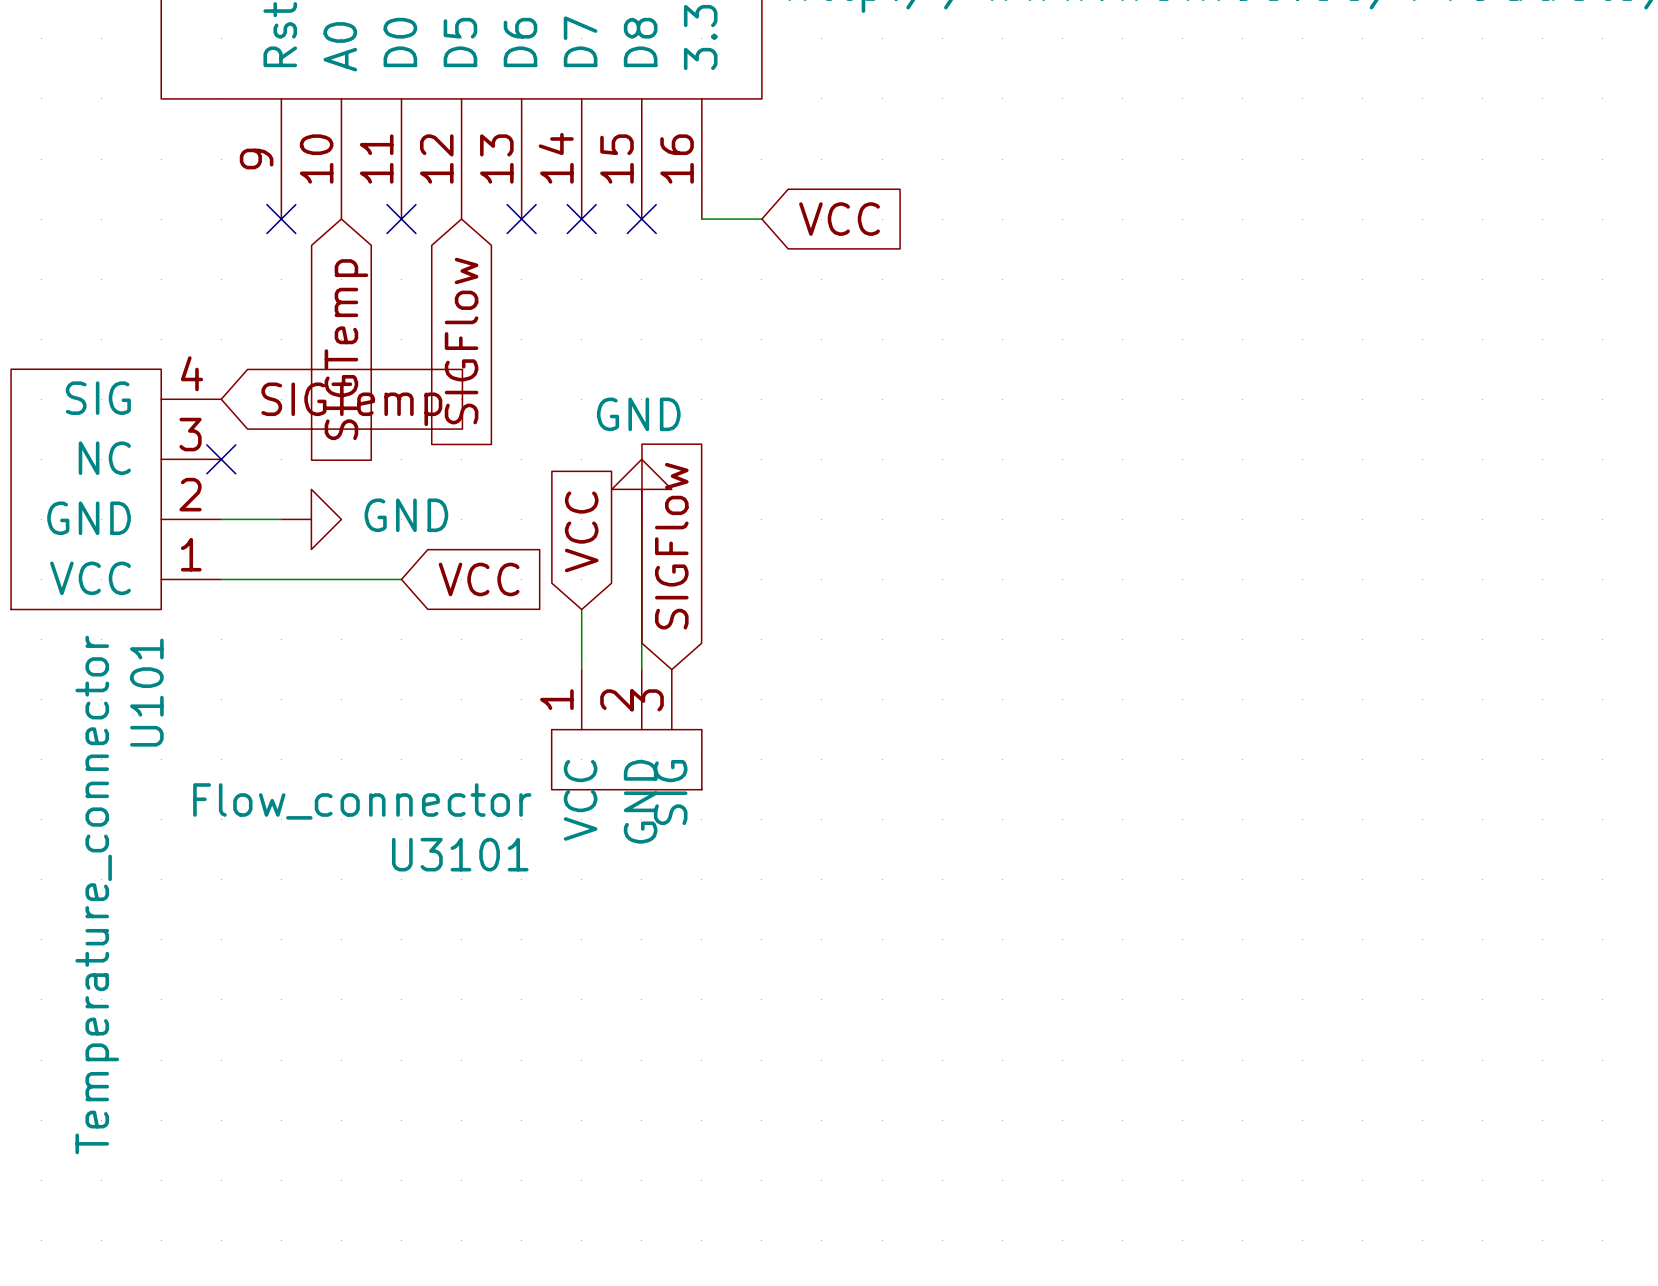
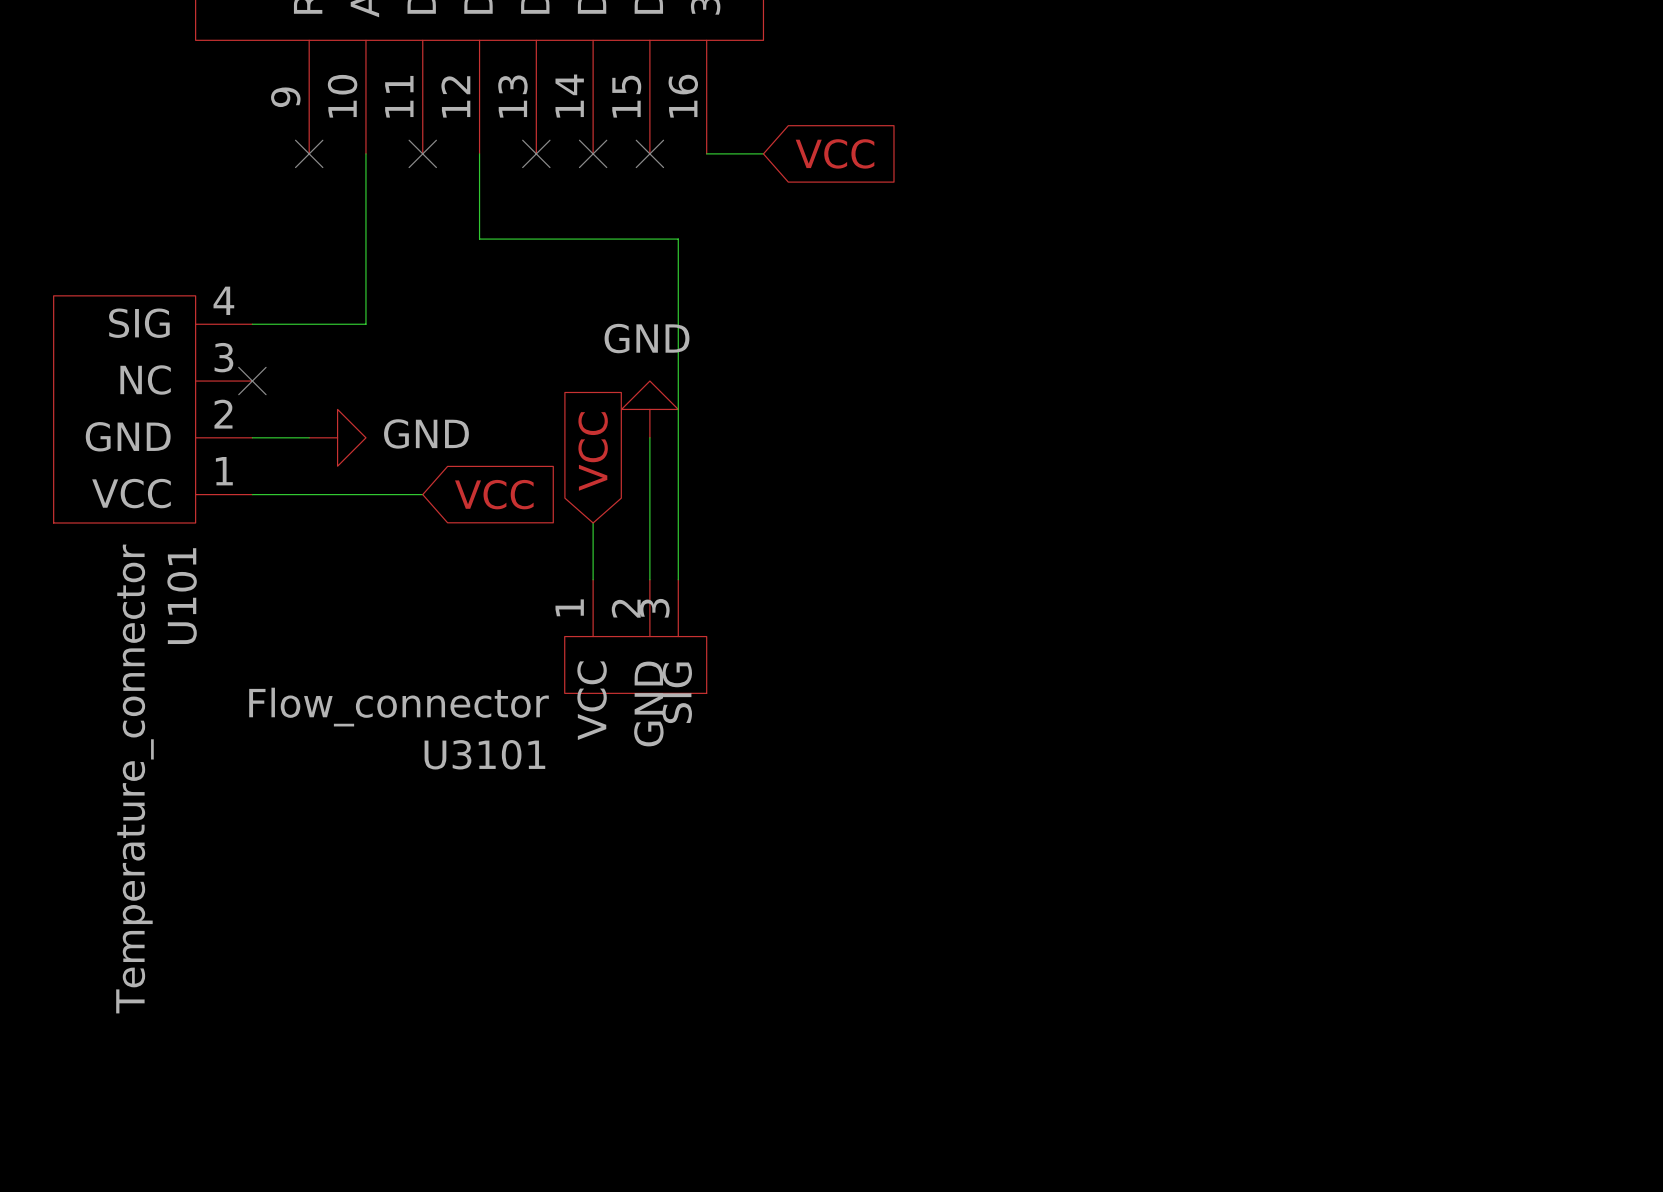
wire: none -> (365, 153) (365, 324) (252, 324)
wire: none -> (479, 153) (479, 239) (678, 239) (678, 579)
global label: SIGFlow (461, 341) -> none
global label: SIGTemp (346, 349) -> none
global label: SIGTemp (351, 404) -> none
global label: SIGFlow (671, 546) -> none

